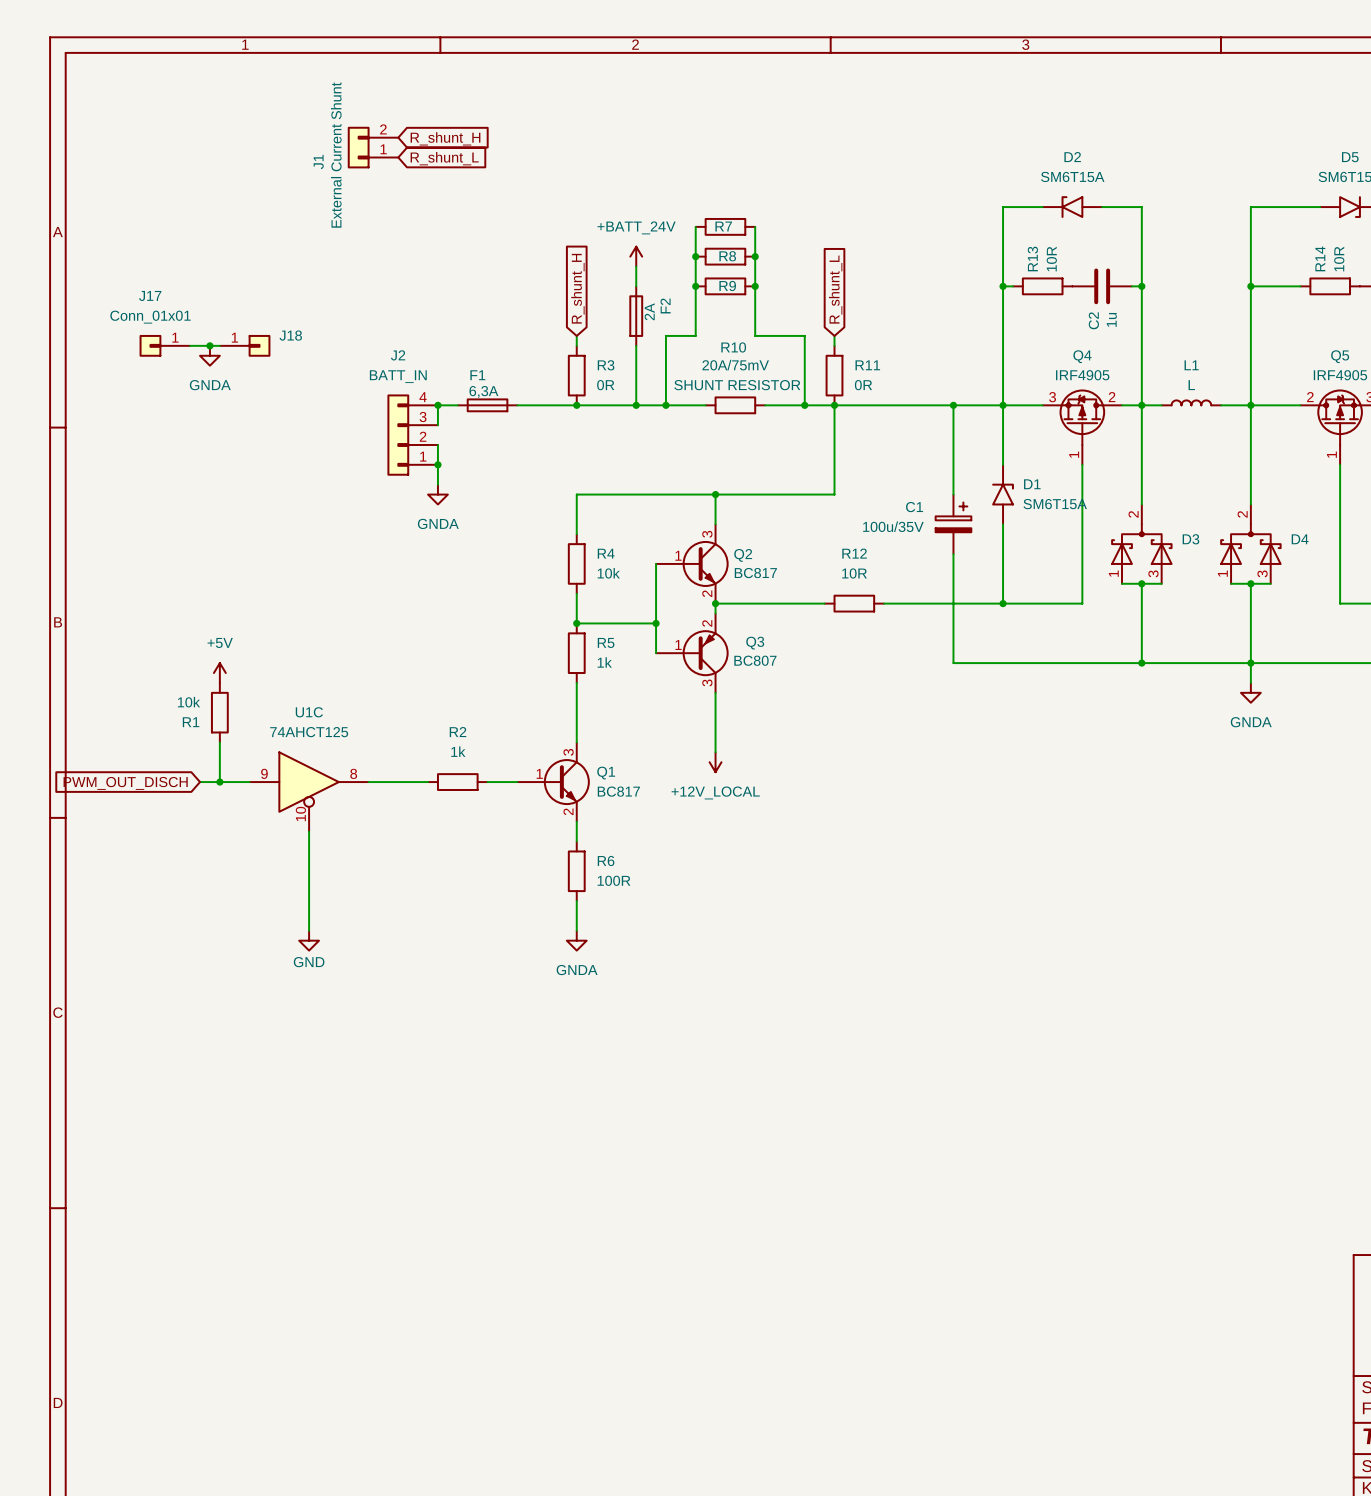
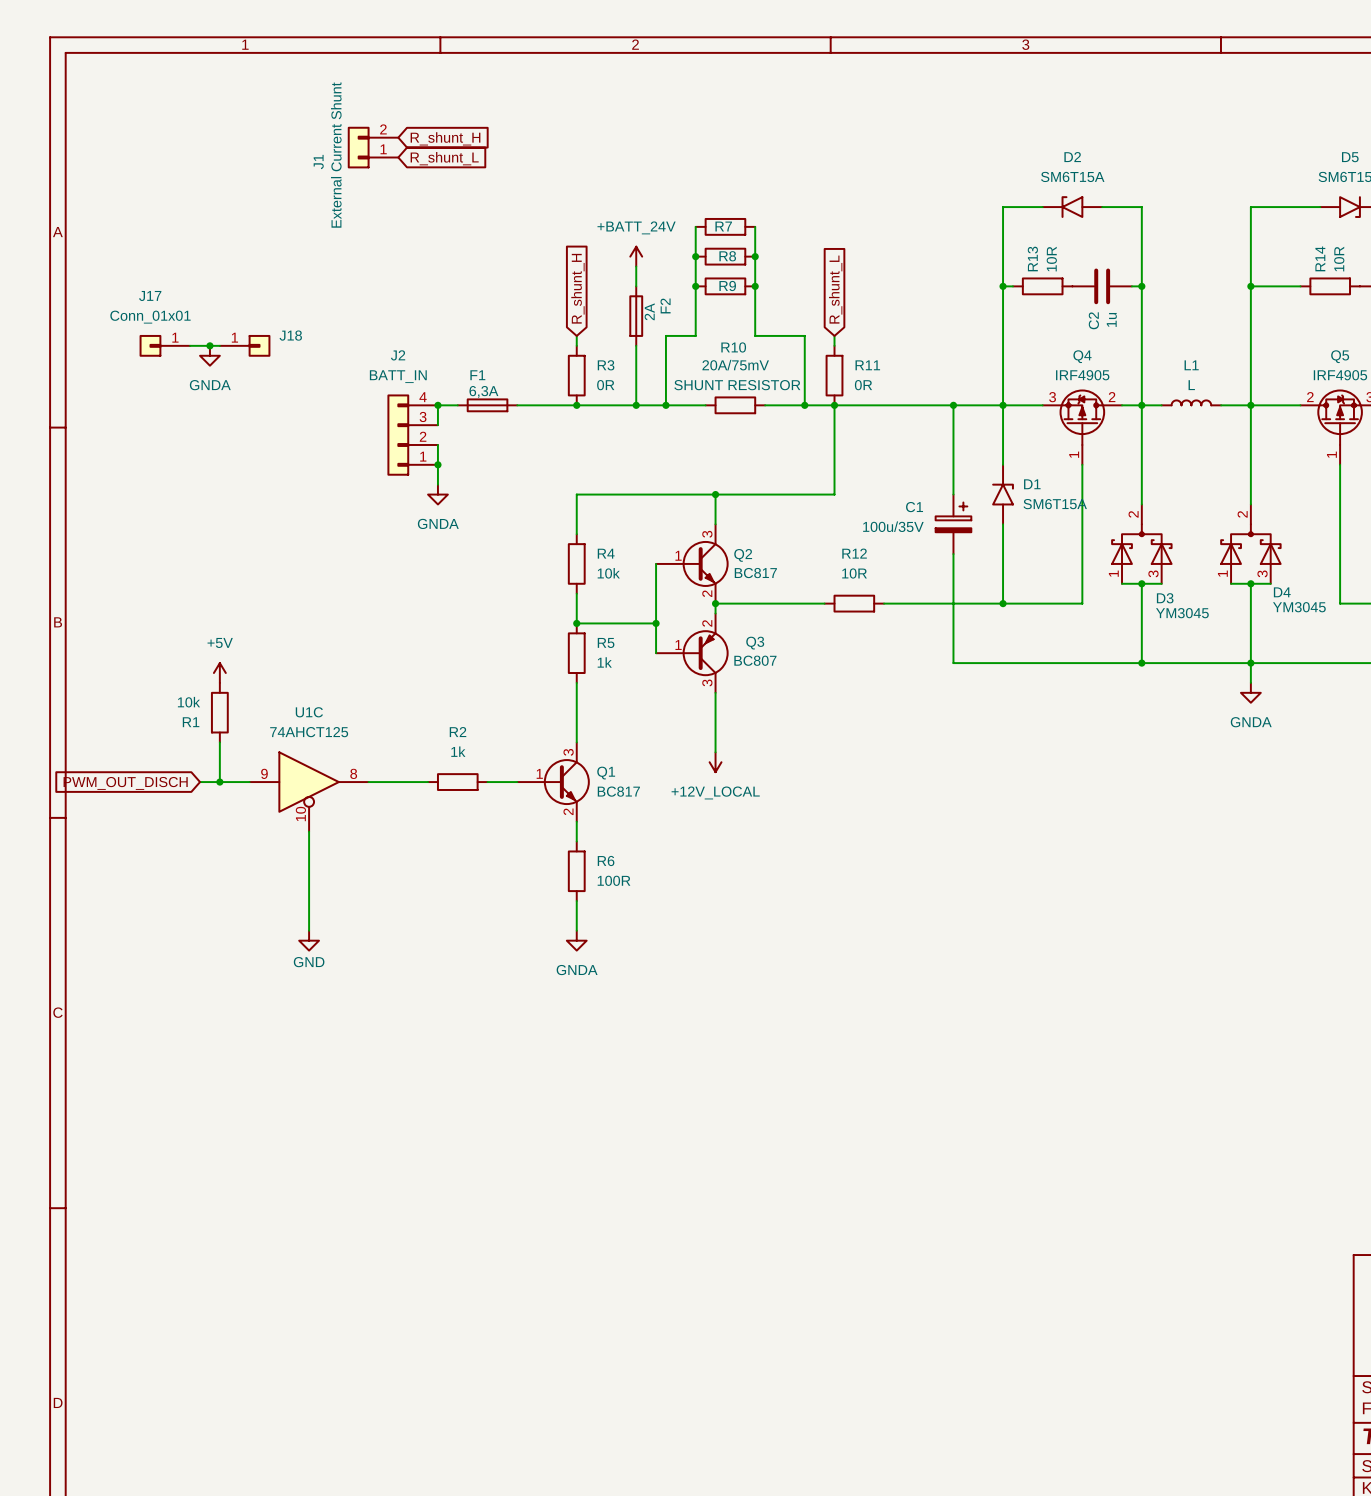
D3 name position: D3 (1190, 539) -> D3 (1165, 598)
D4 name position: D4 (1300, 539) -> D4 (1282, 592)
D4 value: none -> YM3045 (1299, 607)
D3 value: none -> YM3045 (1182, 613)

